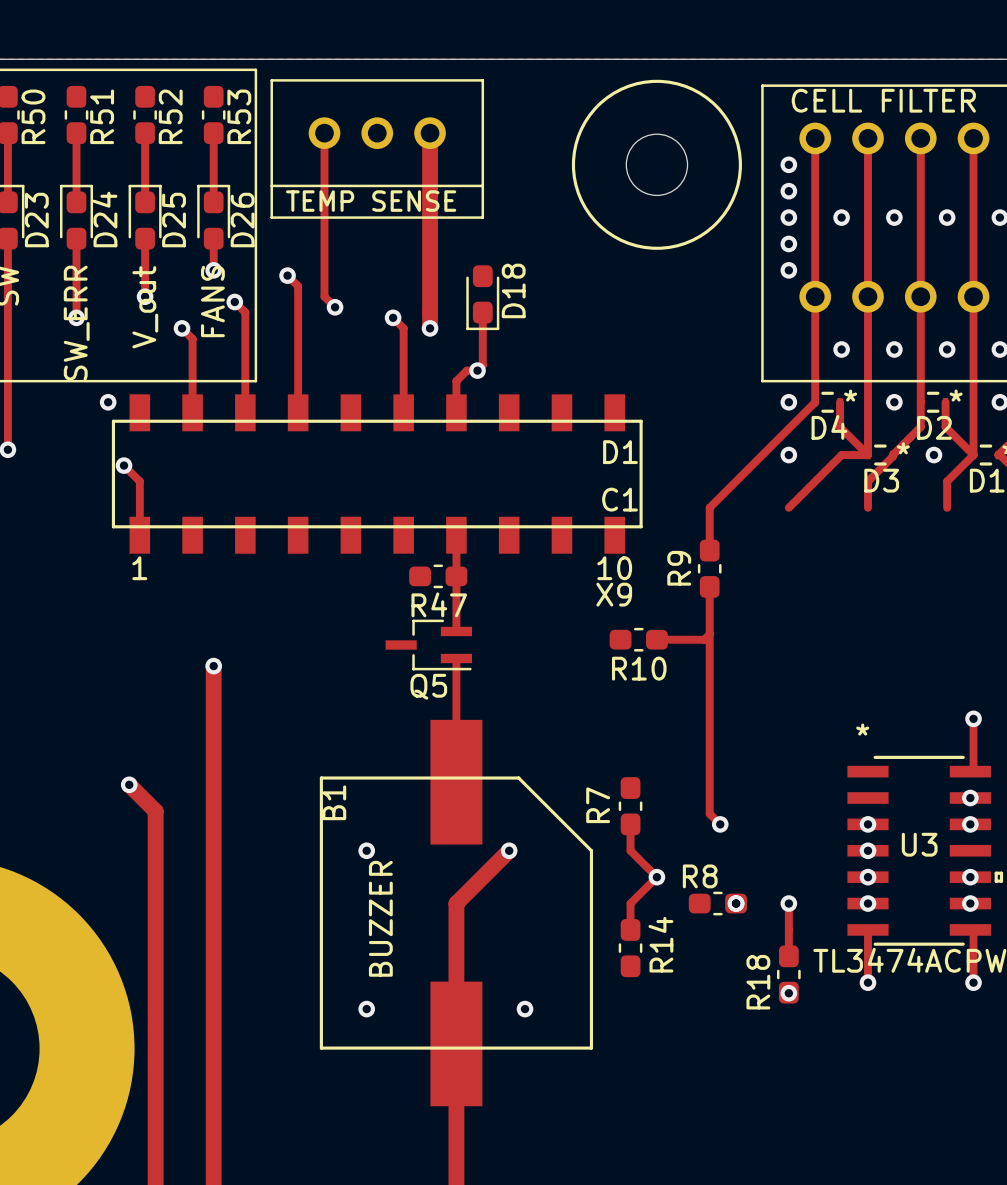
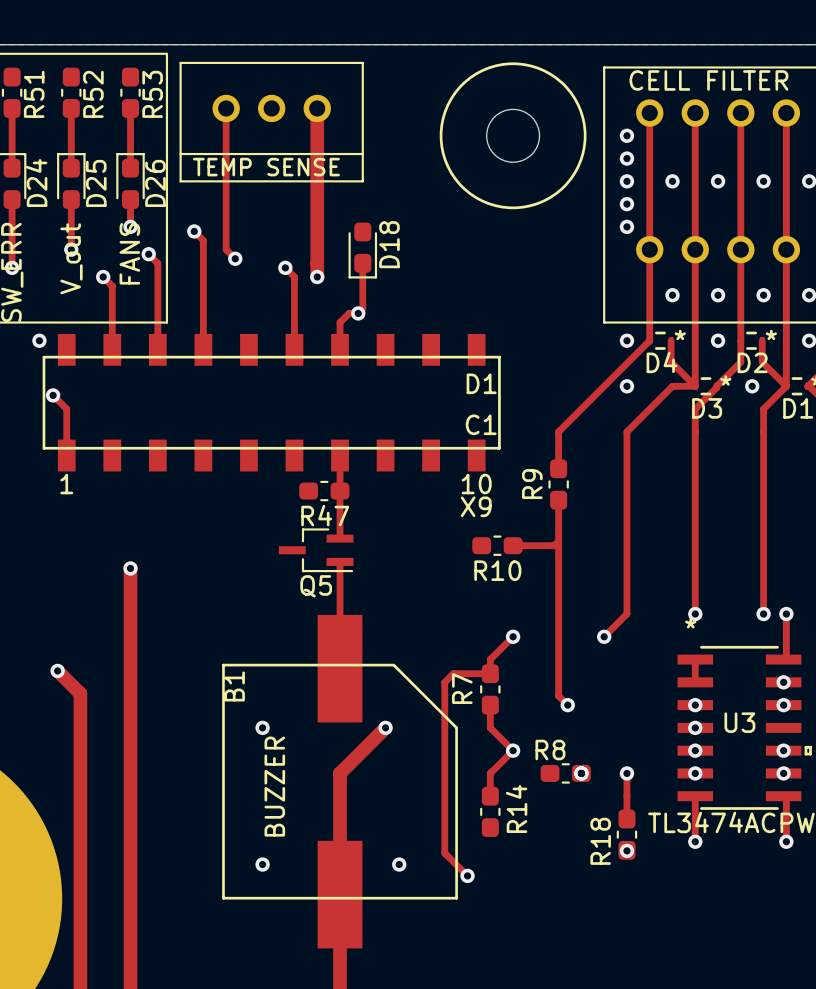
track: none -> (626, 431) (626, 614) (604, 636)
track: none -> (695, 431) (695, 614)
track: none -> (763, 431) (763, 614)
via: none -> (695, 614)
via: none -> (763, 614)
track: none -> (513, 636) (490, 659) (490, 673) (453, 673) (444, 682) (444, 853) (467, 875)
via: none -> (513, 636)
via: none -> (604, 636)
track: none -> (695, 659) (695, 682)
via: none -> (467, 875)

